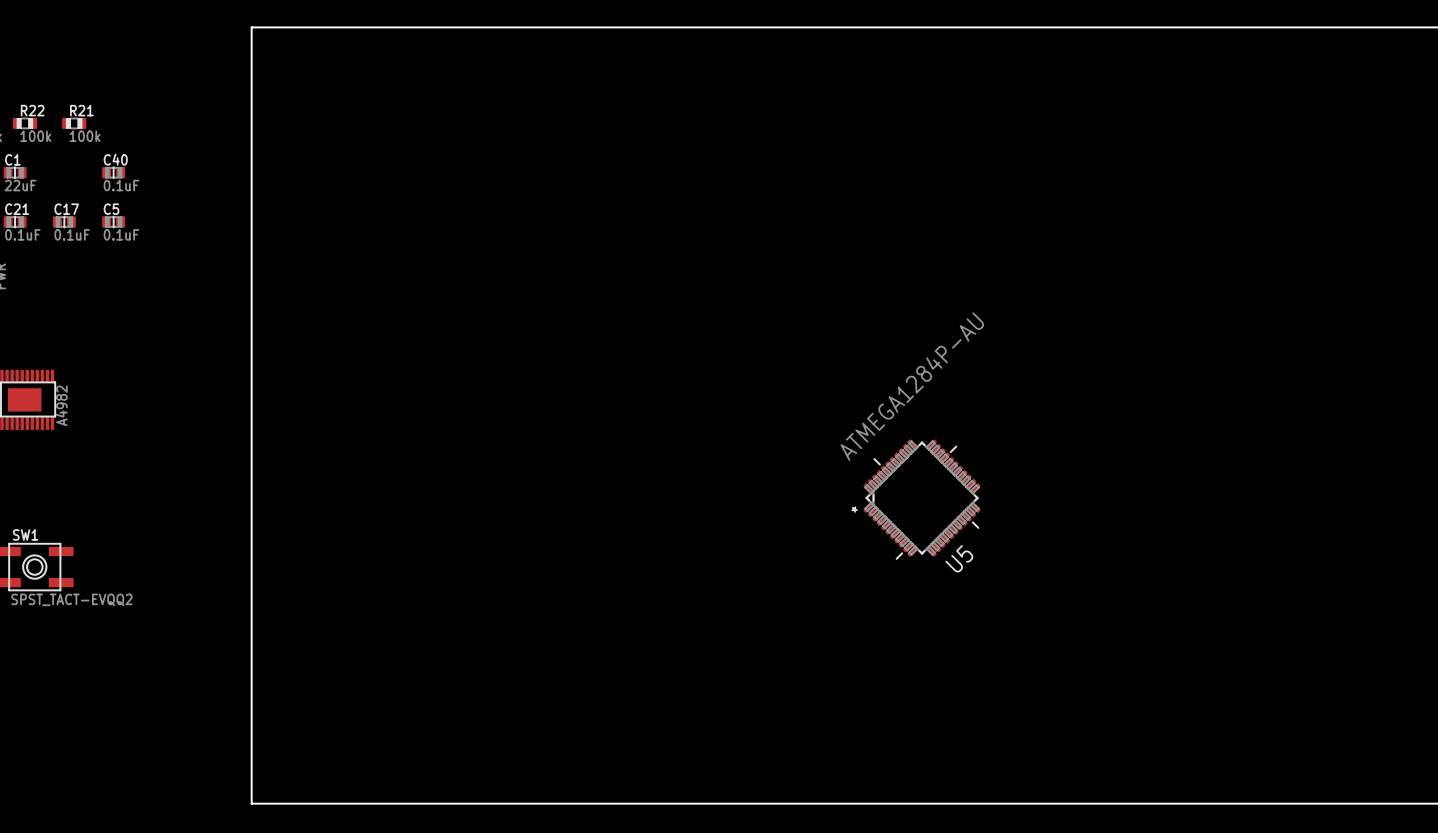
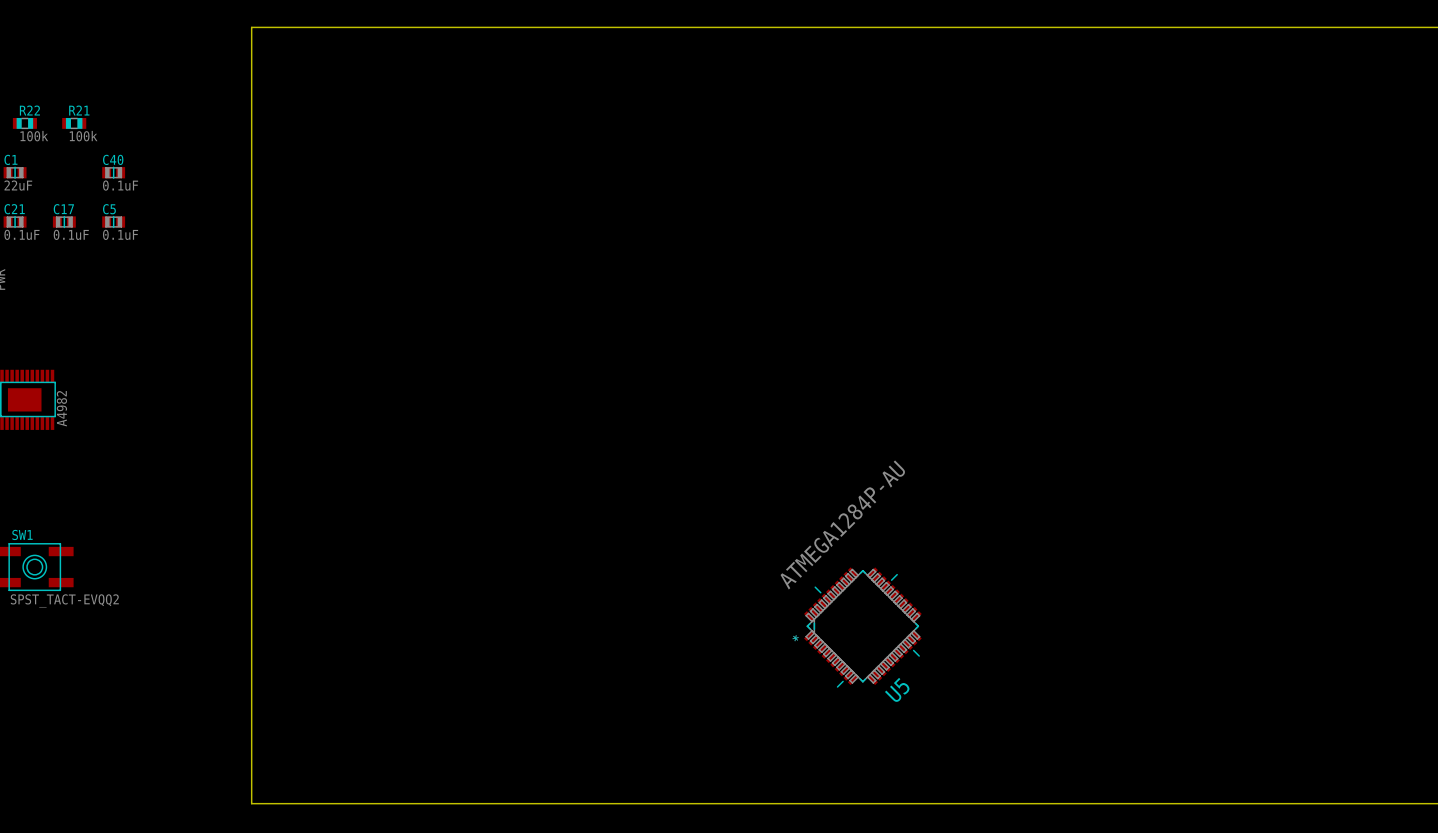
U5 position: (922, 499) -> (862, 627)

